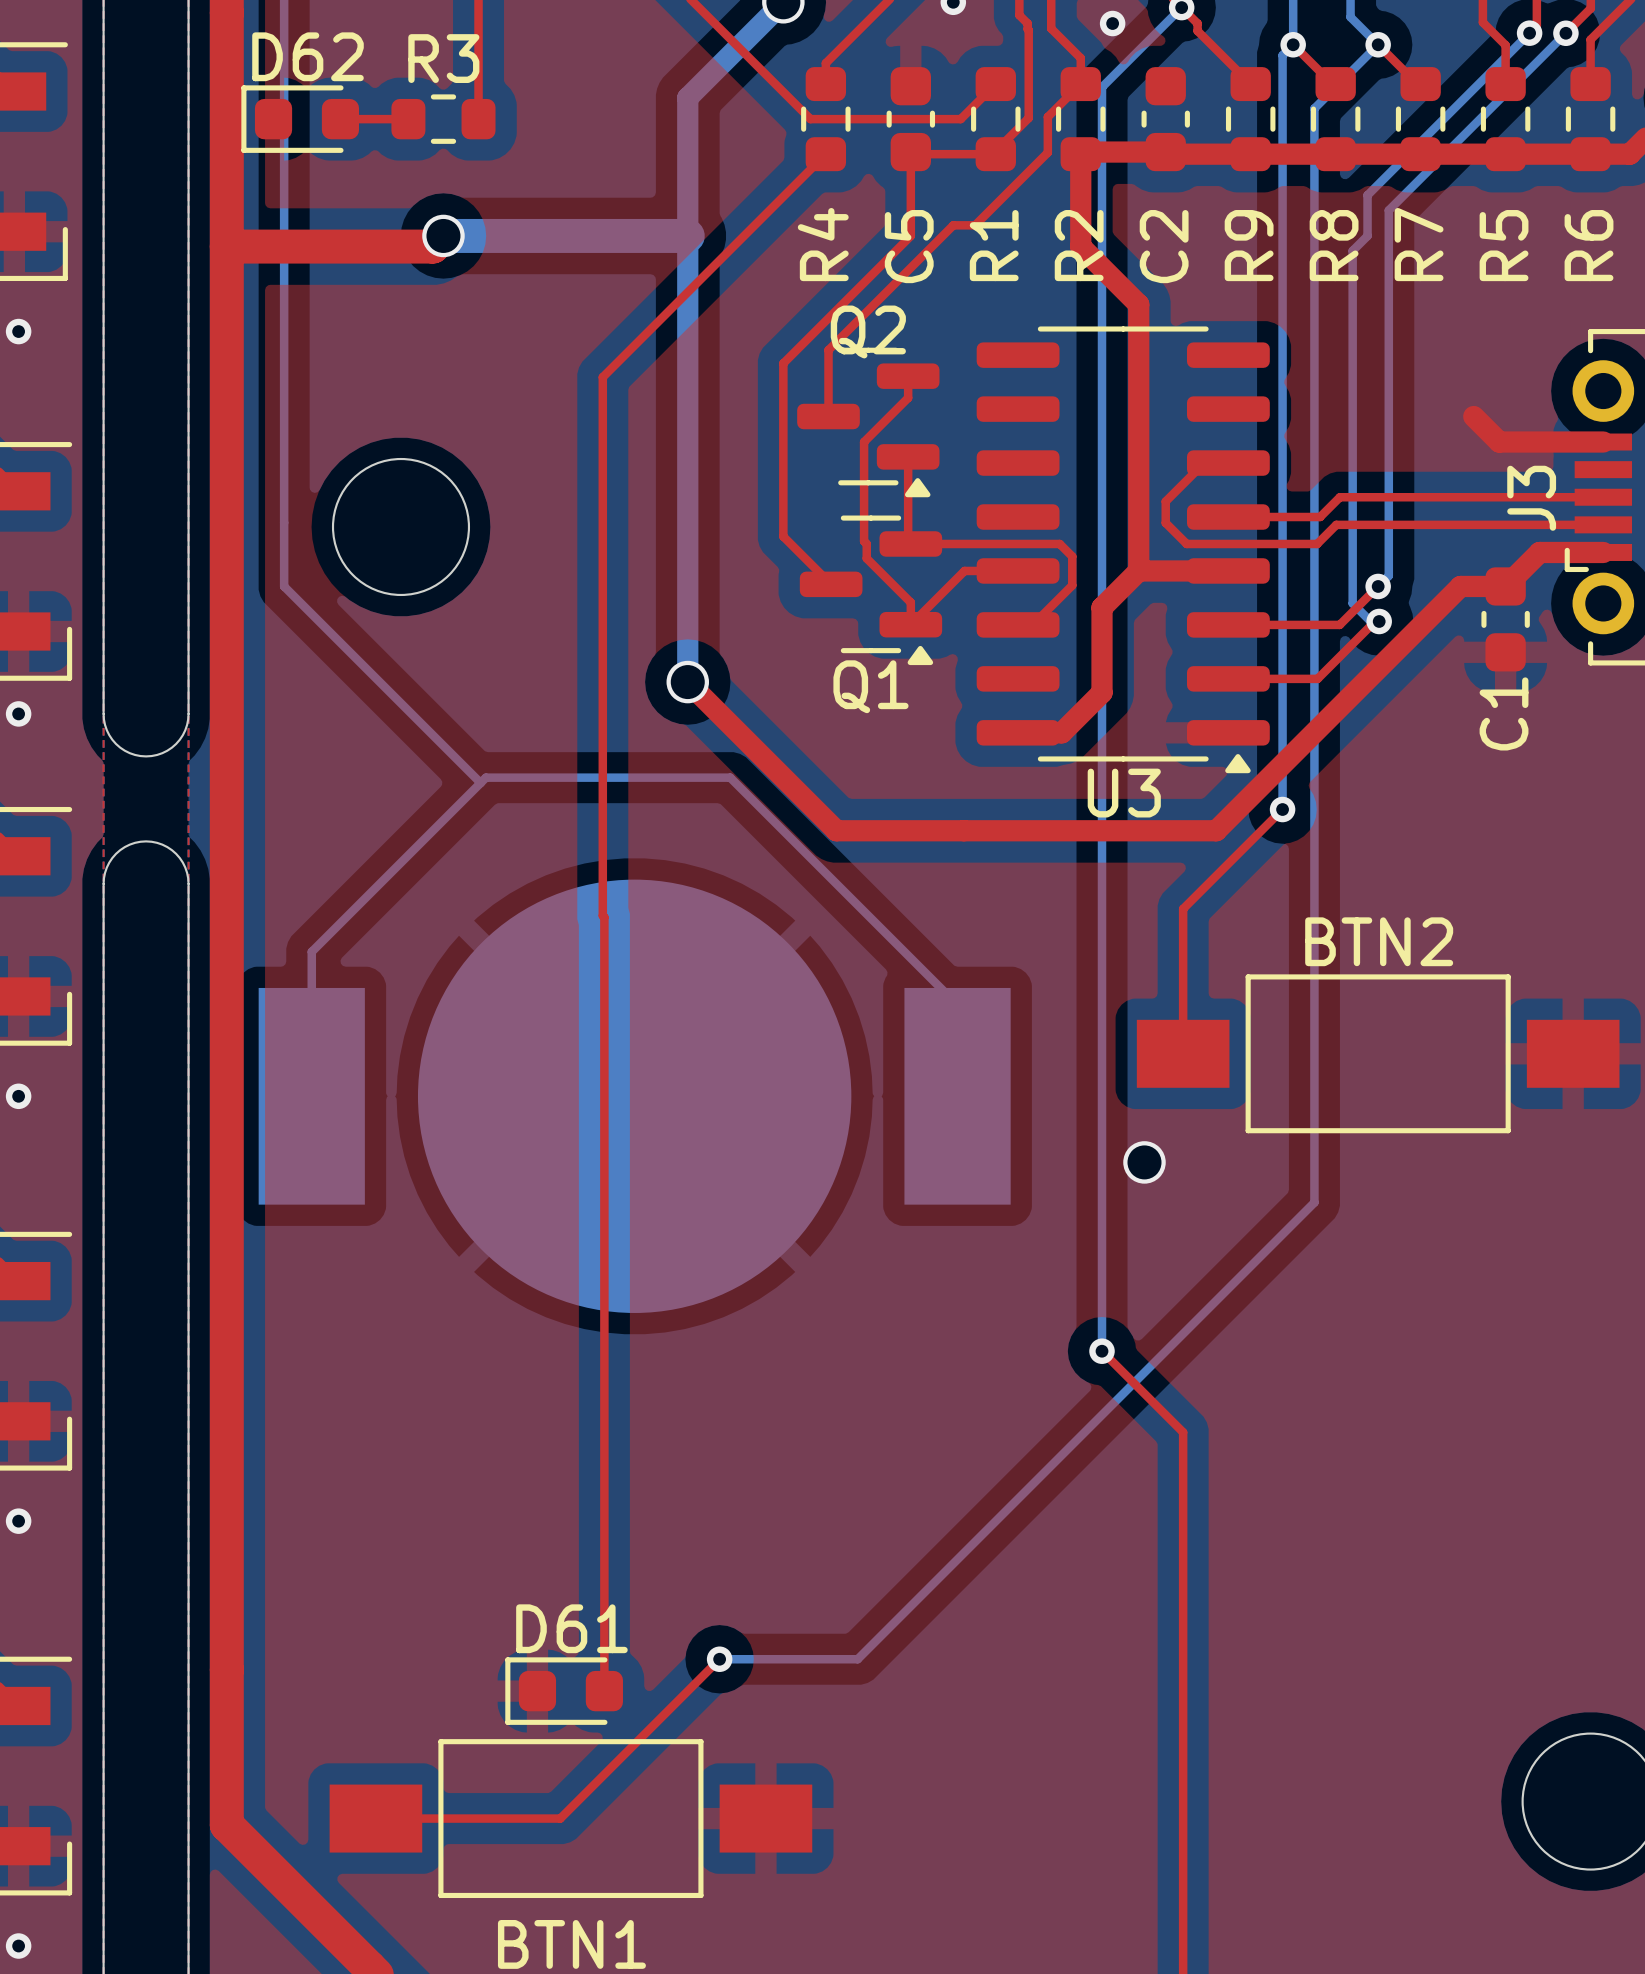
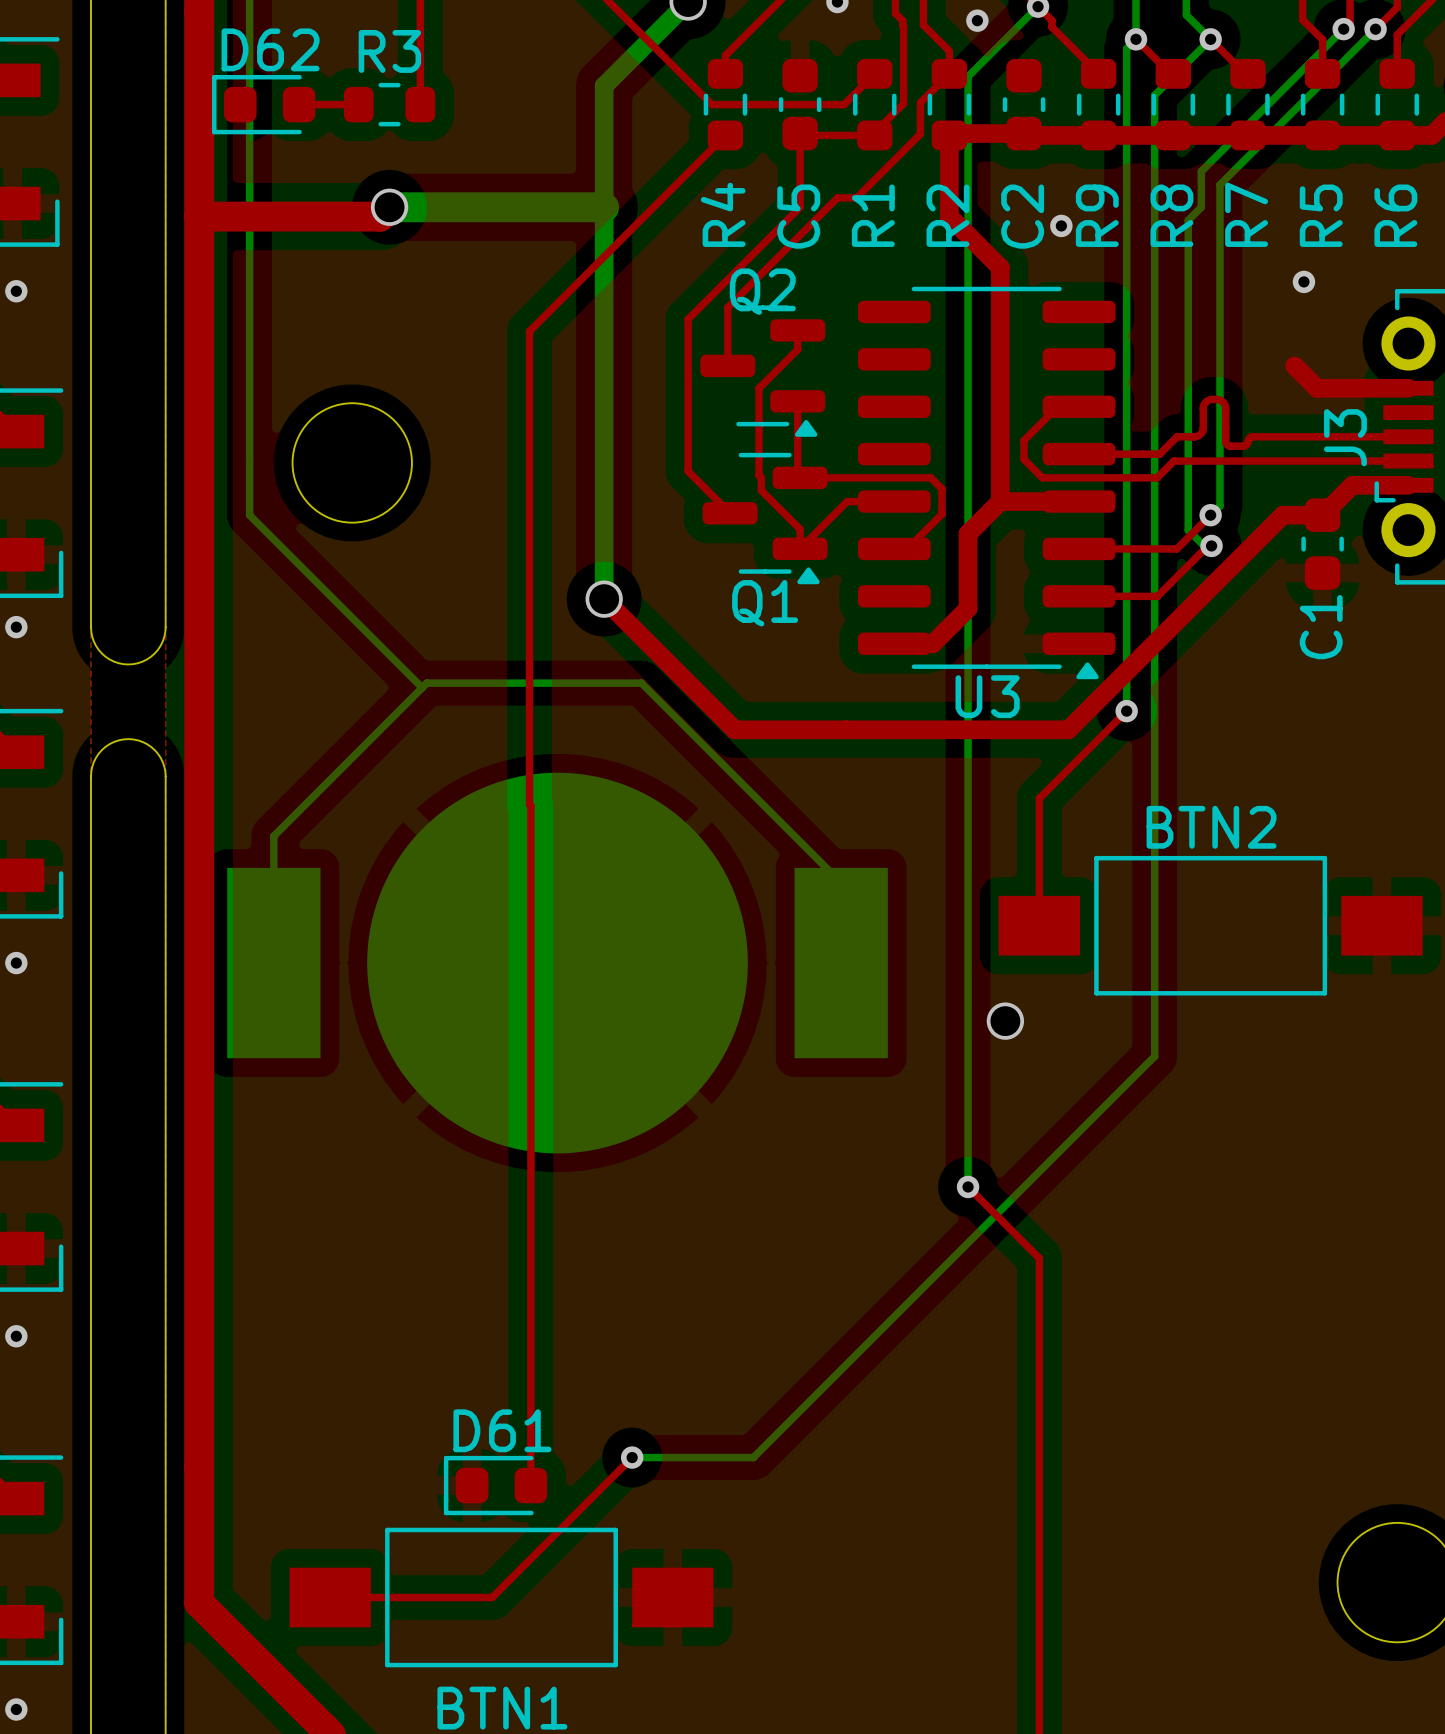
via: none -> (1061, 225)
via: none -> (1303, 281)
top track: (1359, 497) (1426, 497) -> (1194, 436) (1202, 431) (1203, 405) (1206, 401) (1212, 399) (1220, 400) (1225, 405) (1227, 444) (1244, 445) (1249, 438) (1252, 436)

